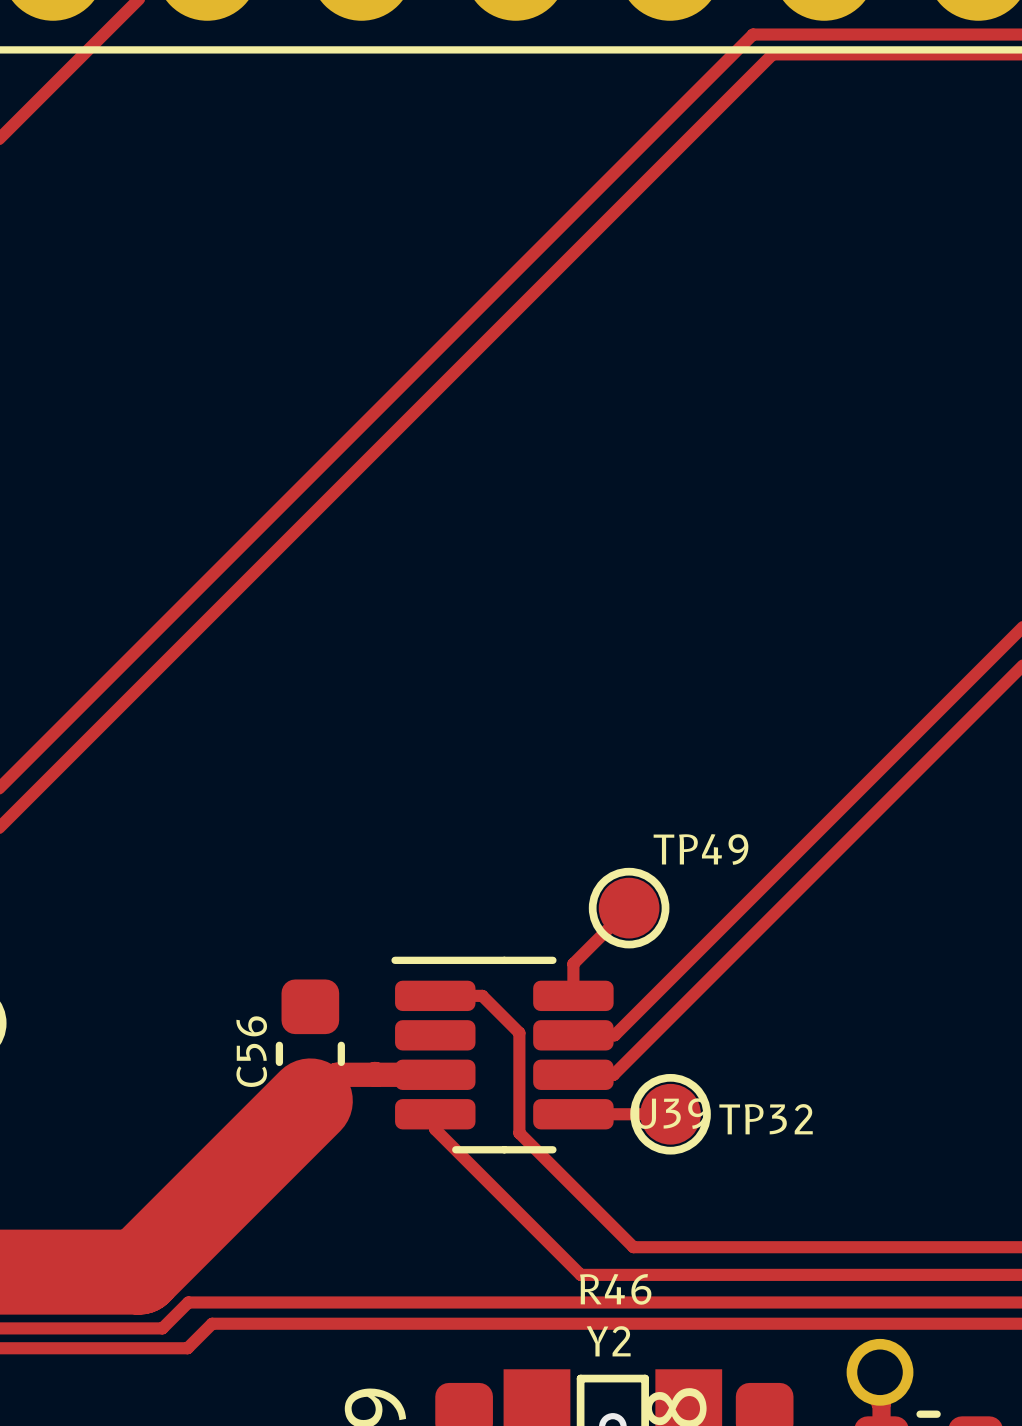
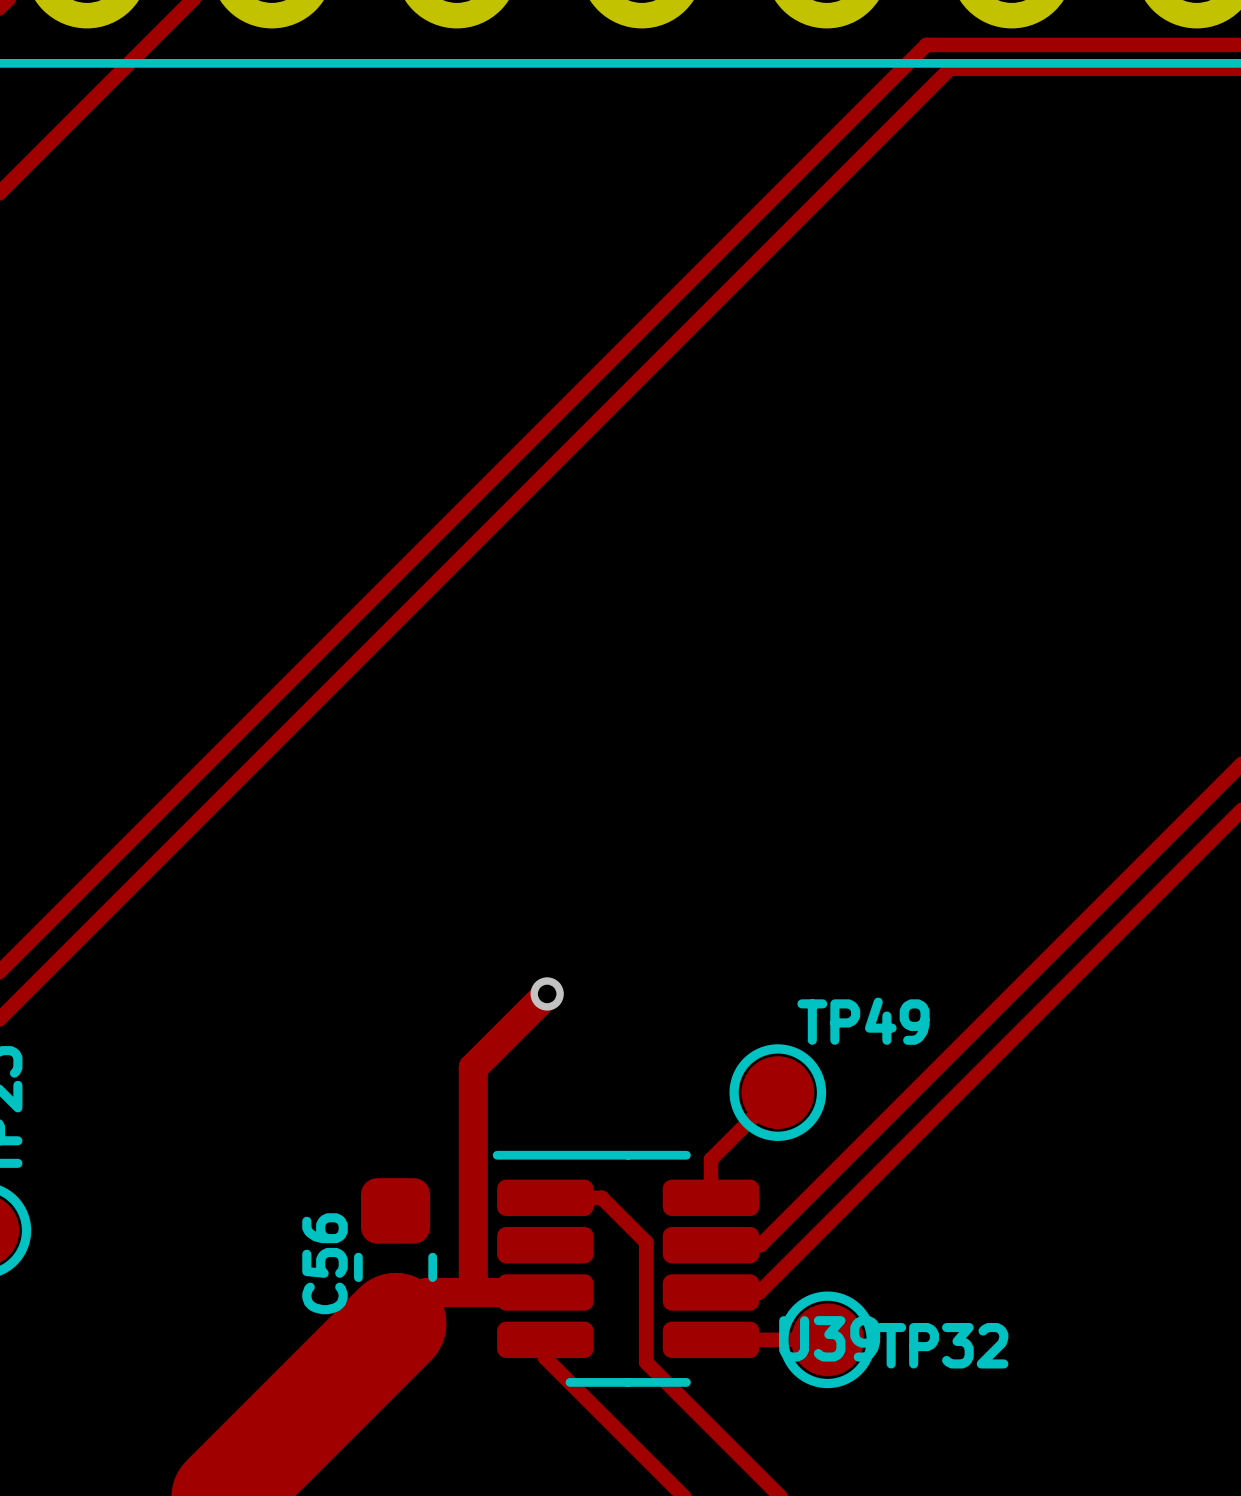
track: none -> (547, 993) (473, 1067) (473, 1291)
via: none -> (547, 993)

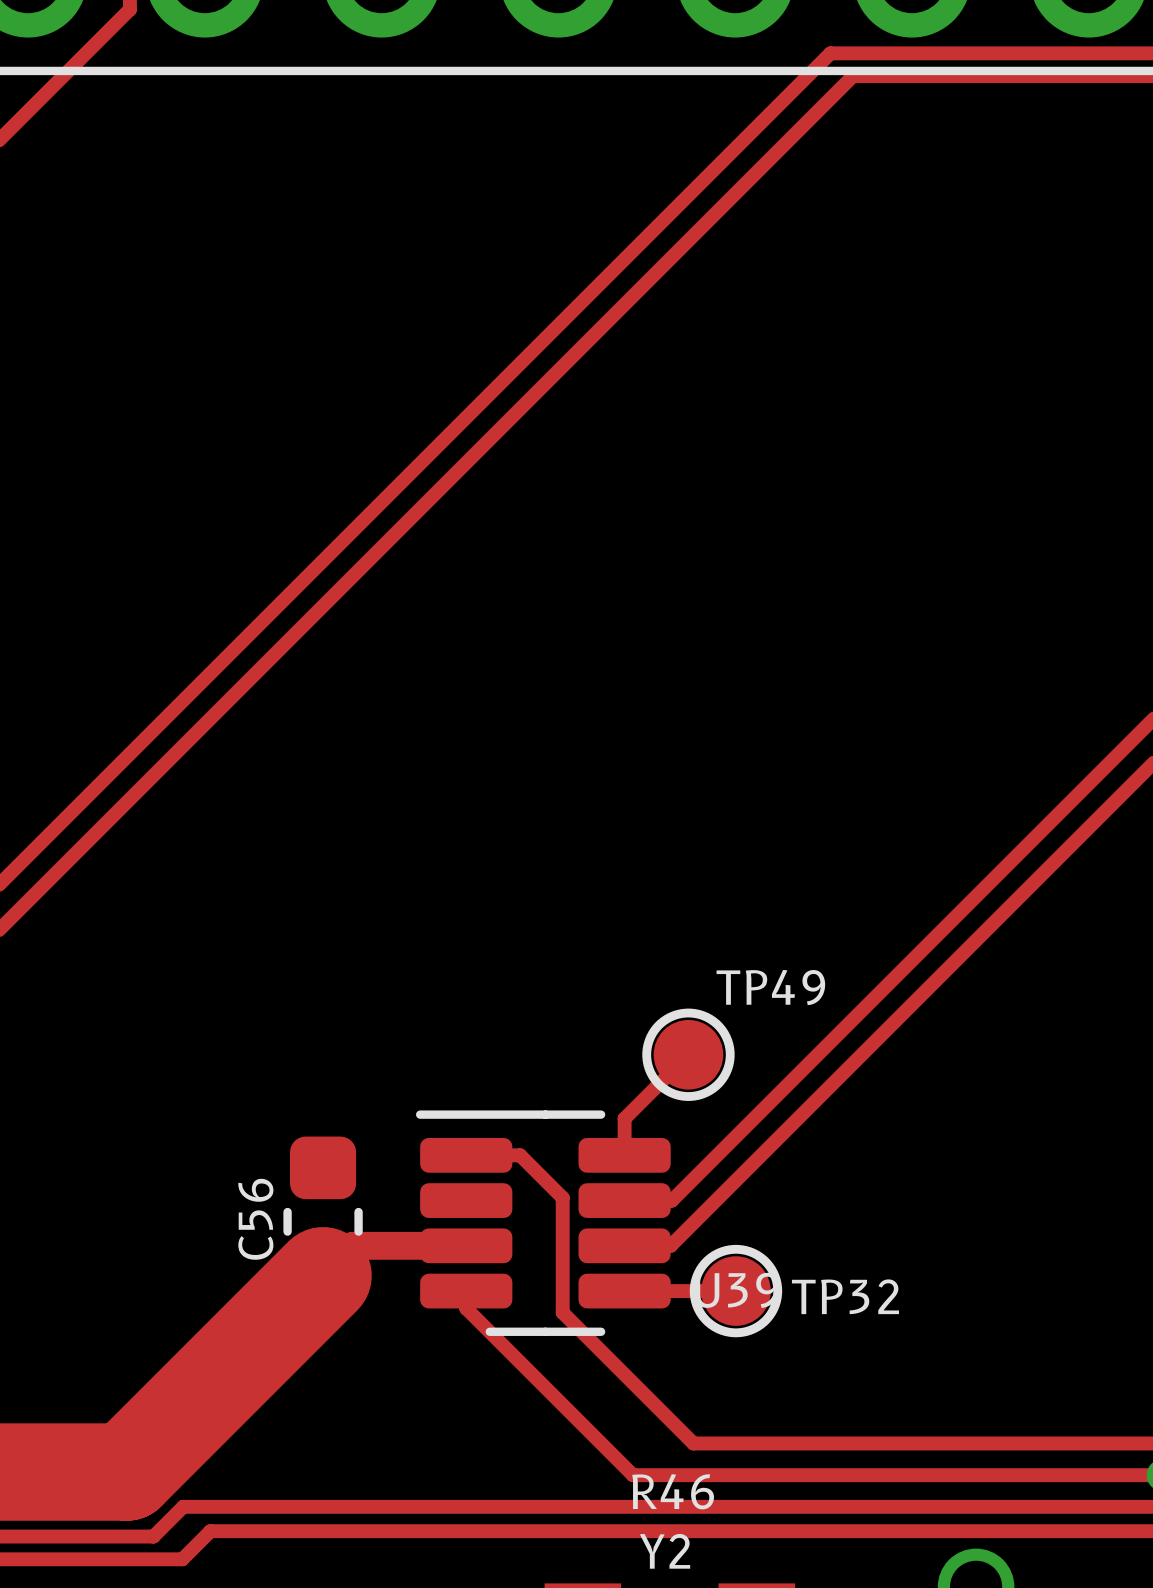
track: (547, 993) (473, 1067) (474, 1292) -> none
via: (547, 993) -> none

